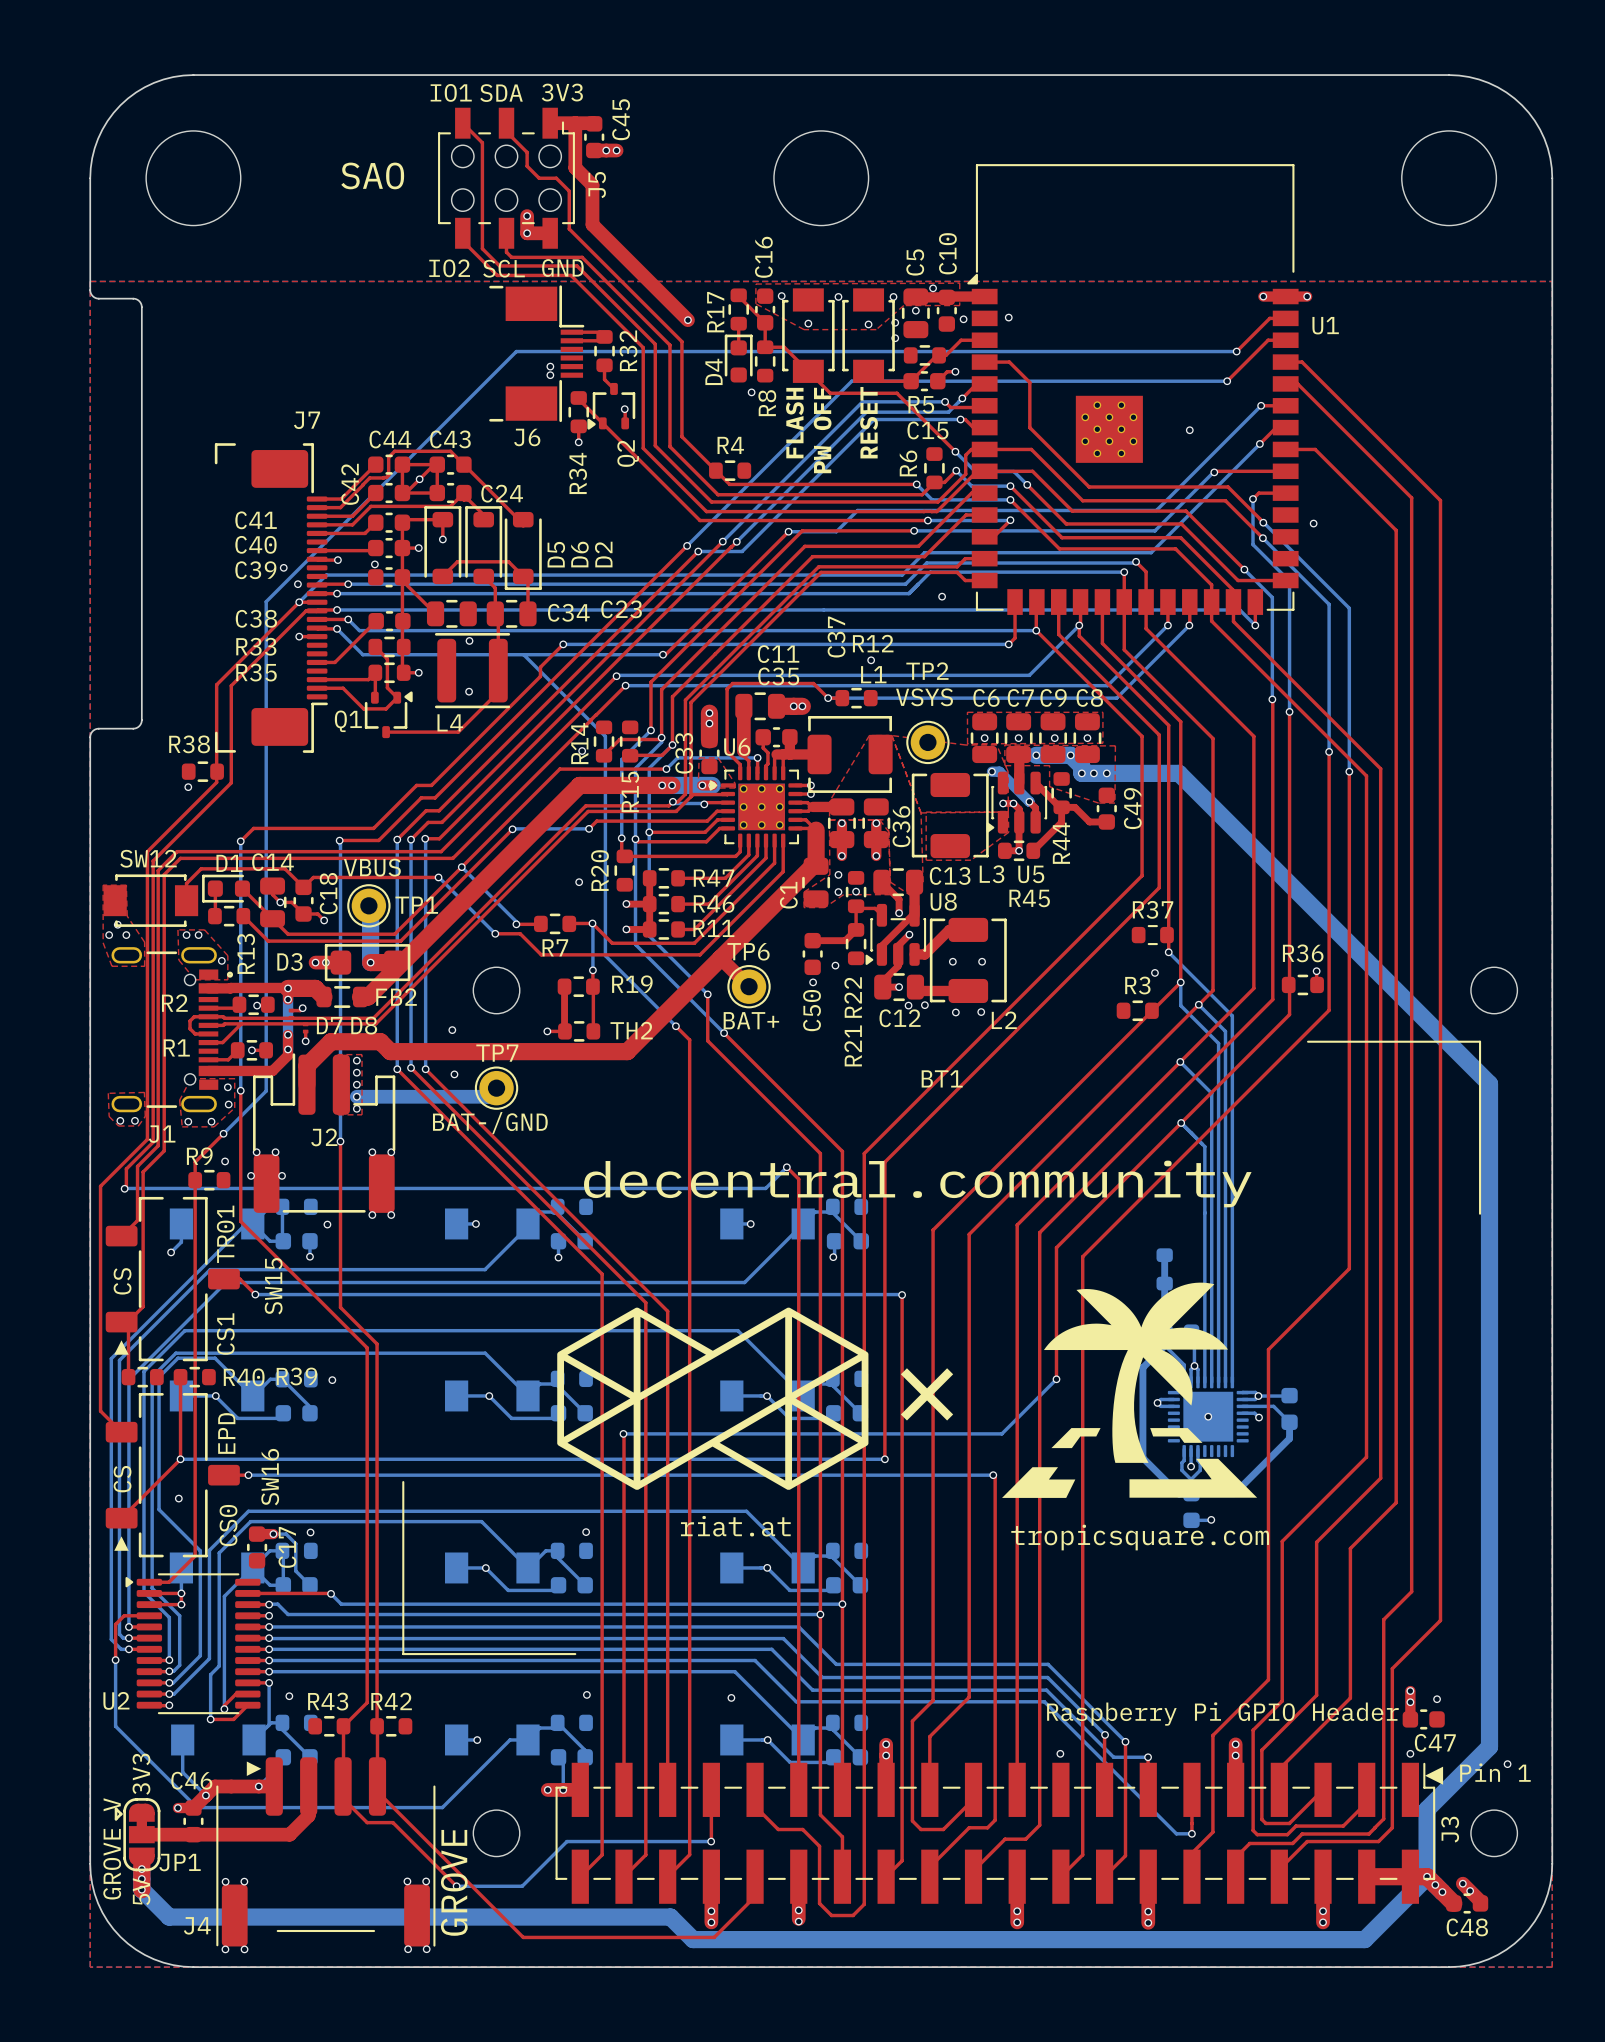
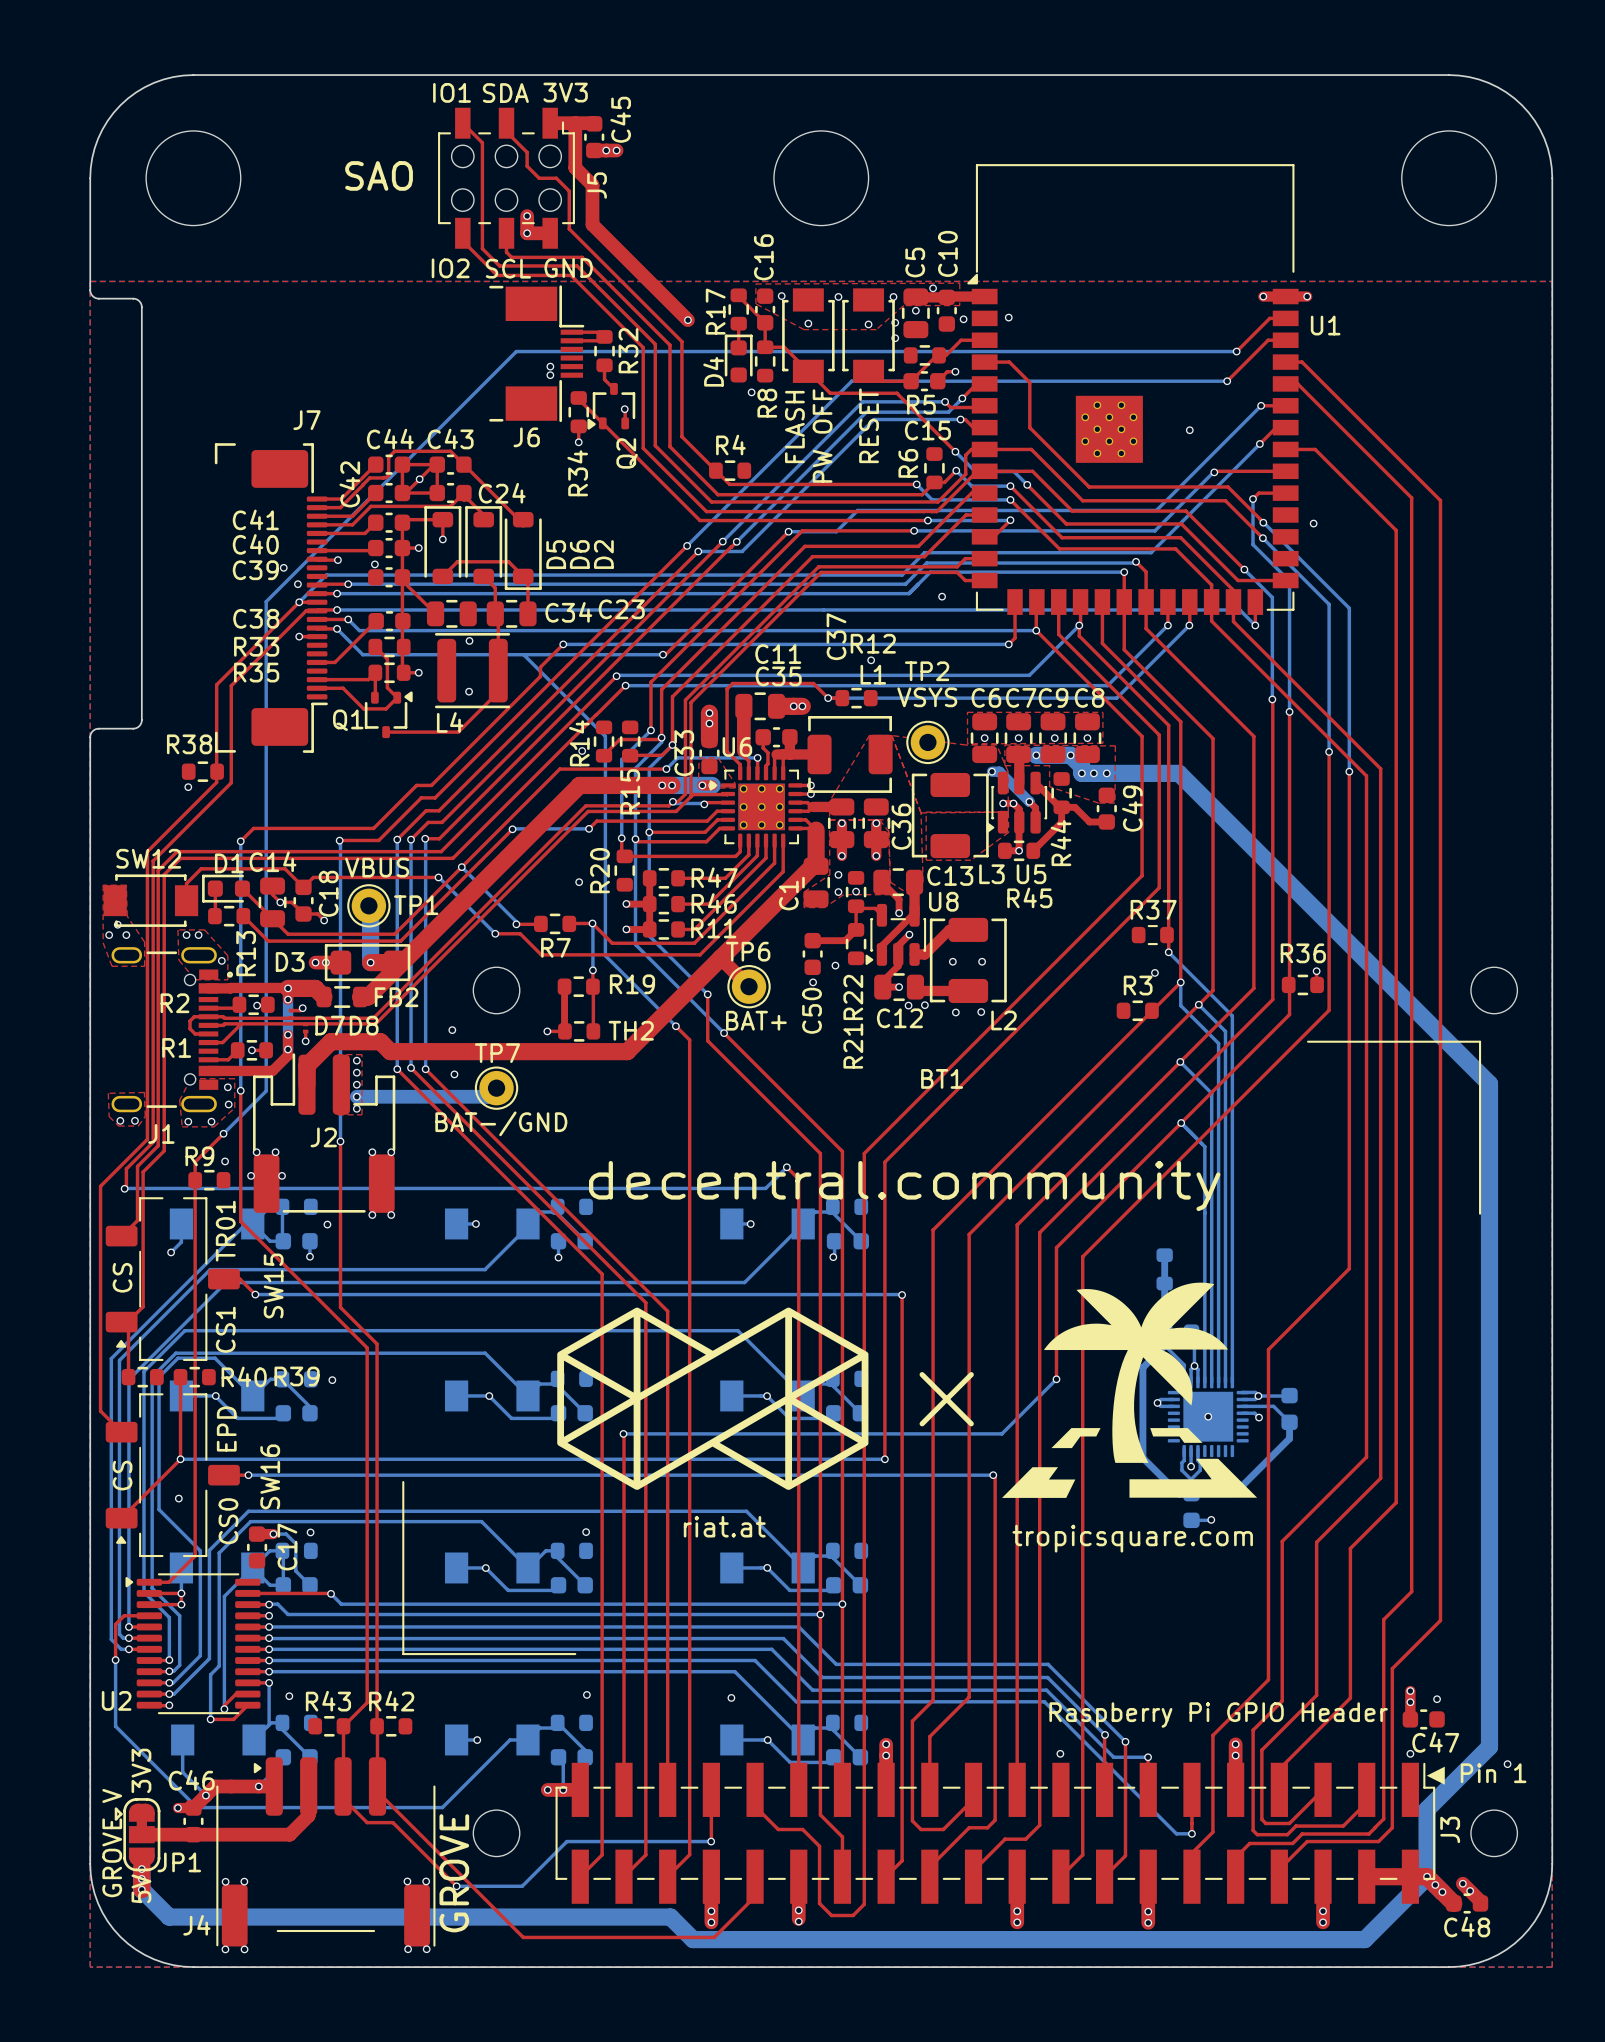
SW15 footprint: [105, 1196, 240, 1362] -> [105, 1197, 240, 1361]
SW16 footprint: [105, 1393, 240, 1558] -> [105, 1393, 240, 1558]
J4 footprint: [216, 1757, 436, 1947] -> [216, 1757, 436, 1947]

